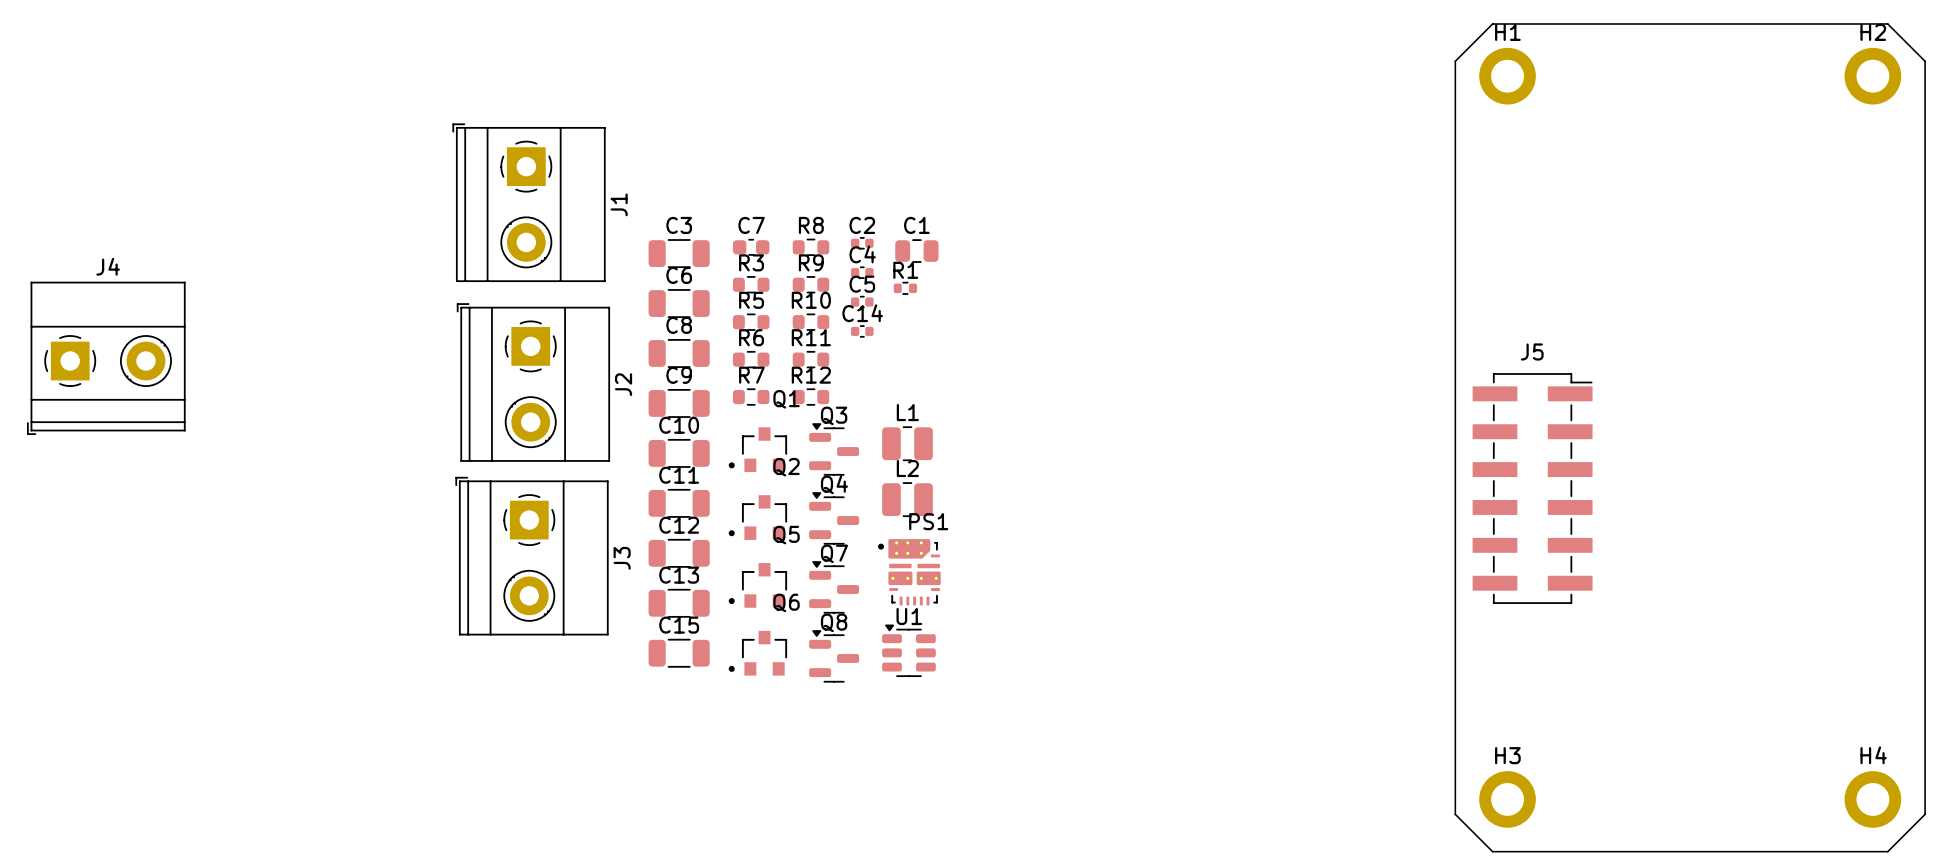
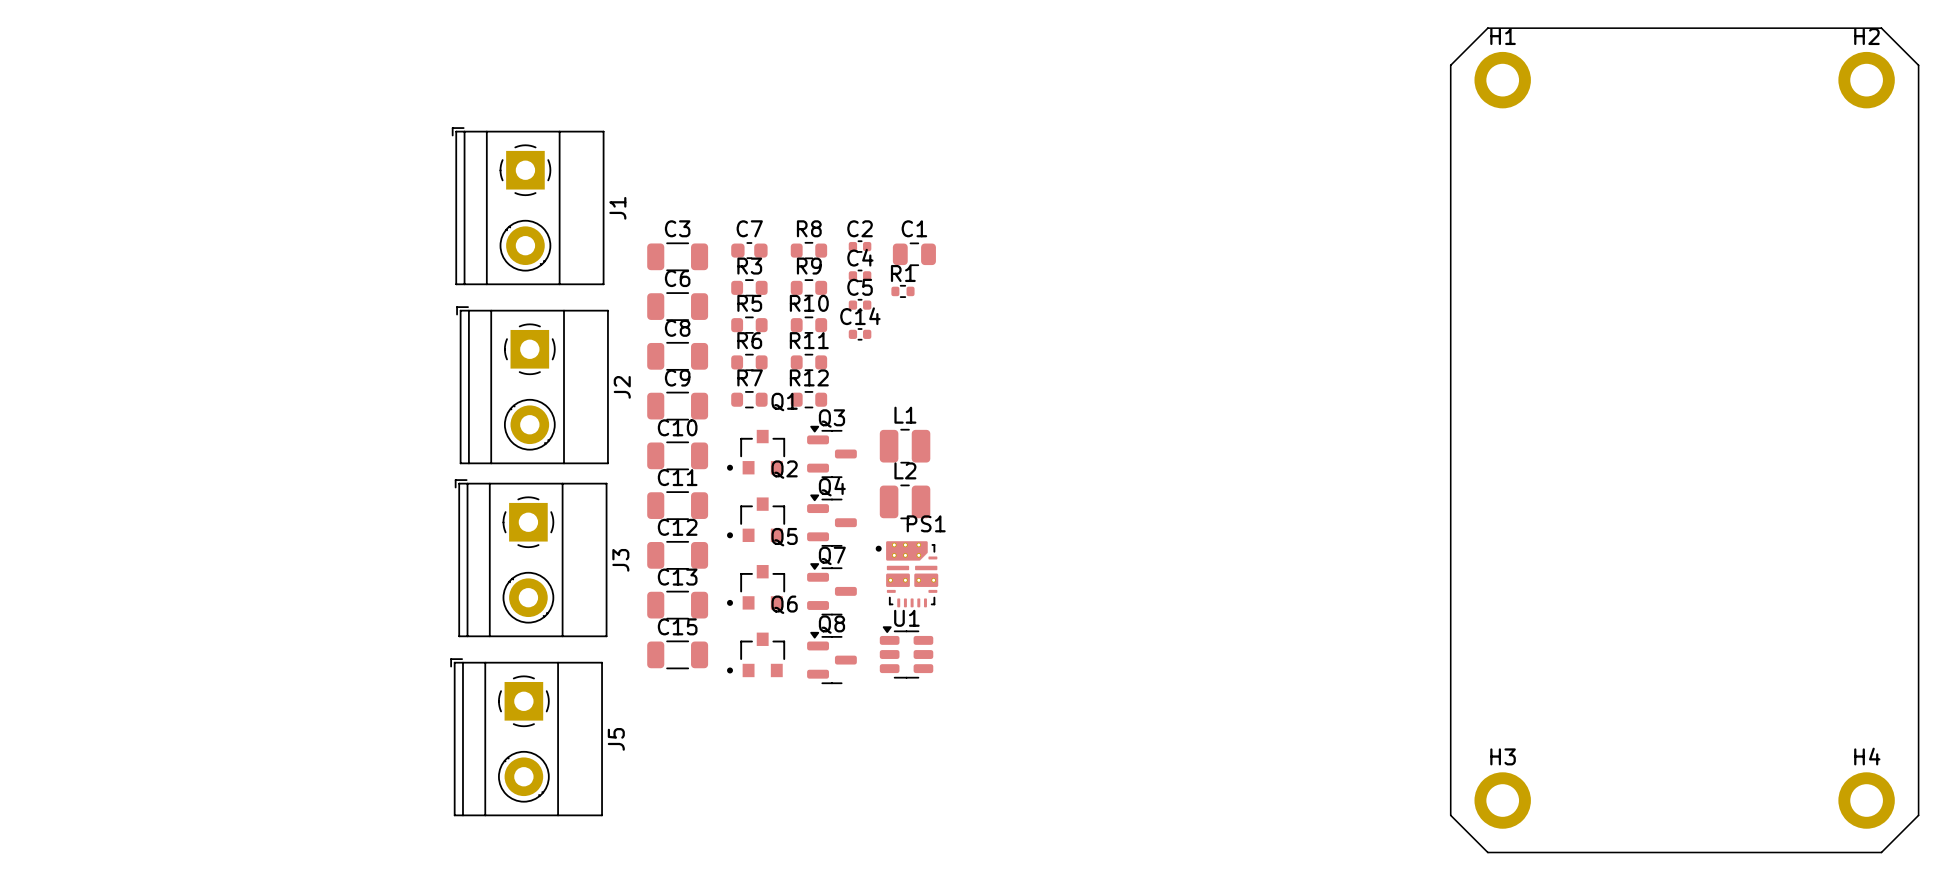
J5 name position: J5 (1532, 351) -> J5 (616, 739)
J4: (106, 358) -> none
J5 footprint: [1472, 373, 1593, 604] -> [450, 658, 603, 817]

